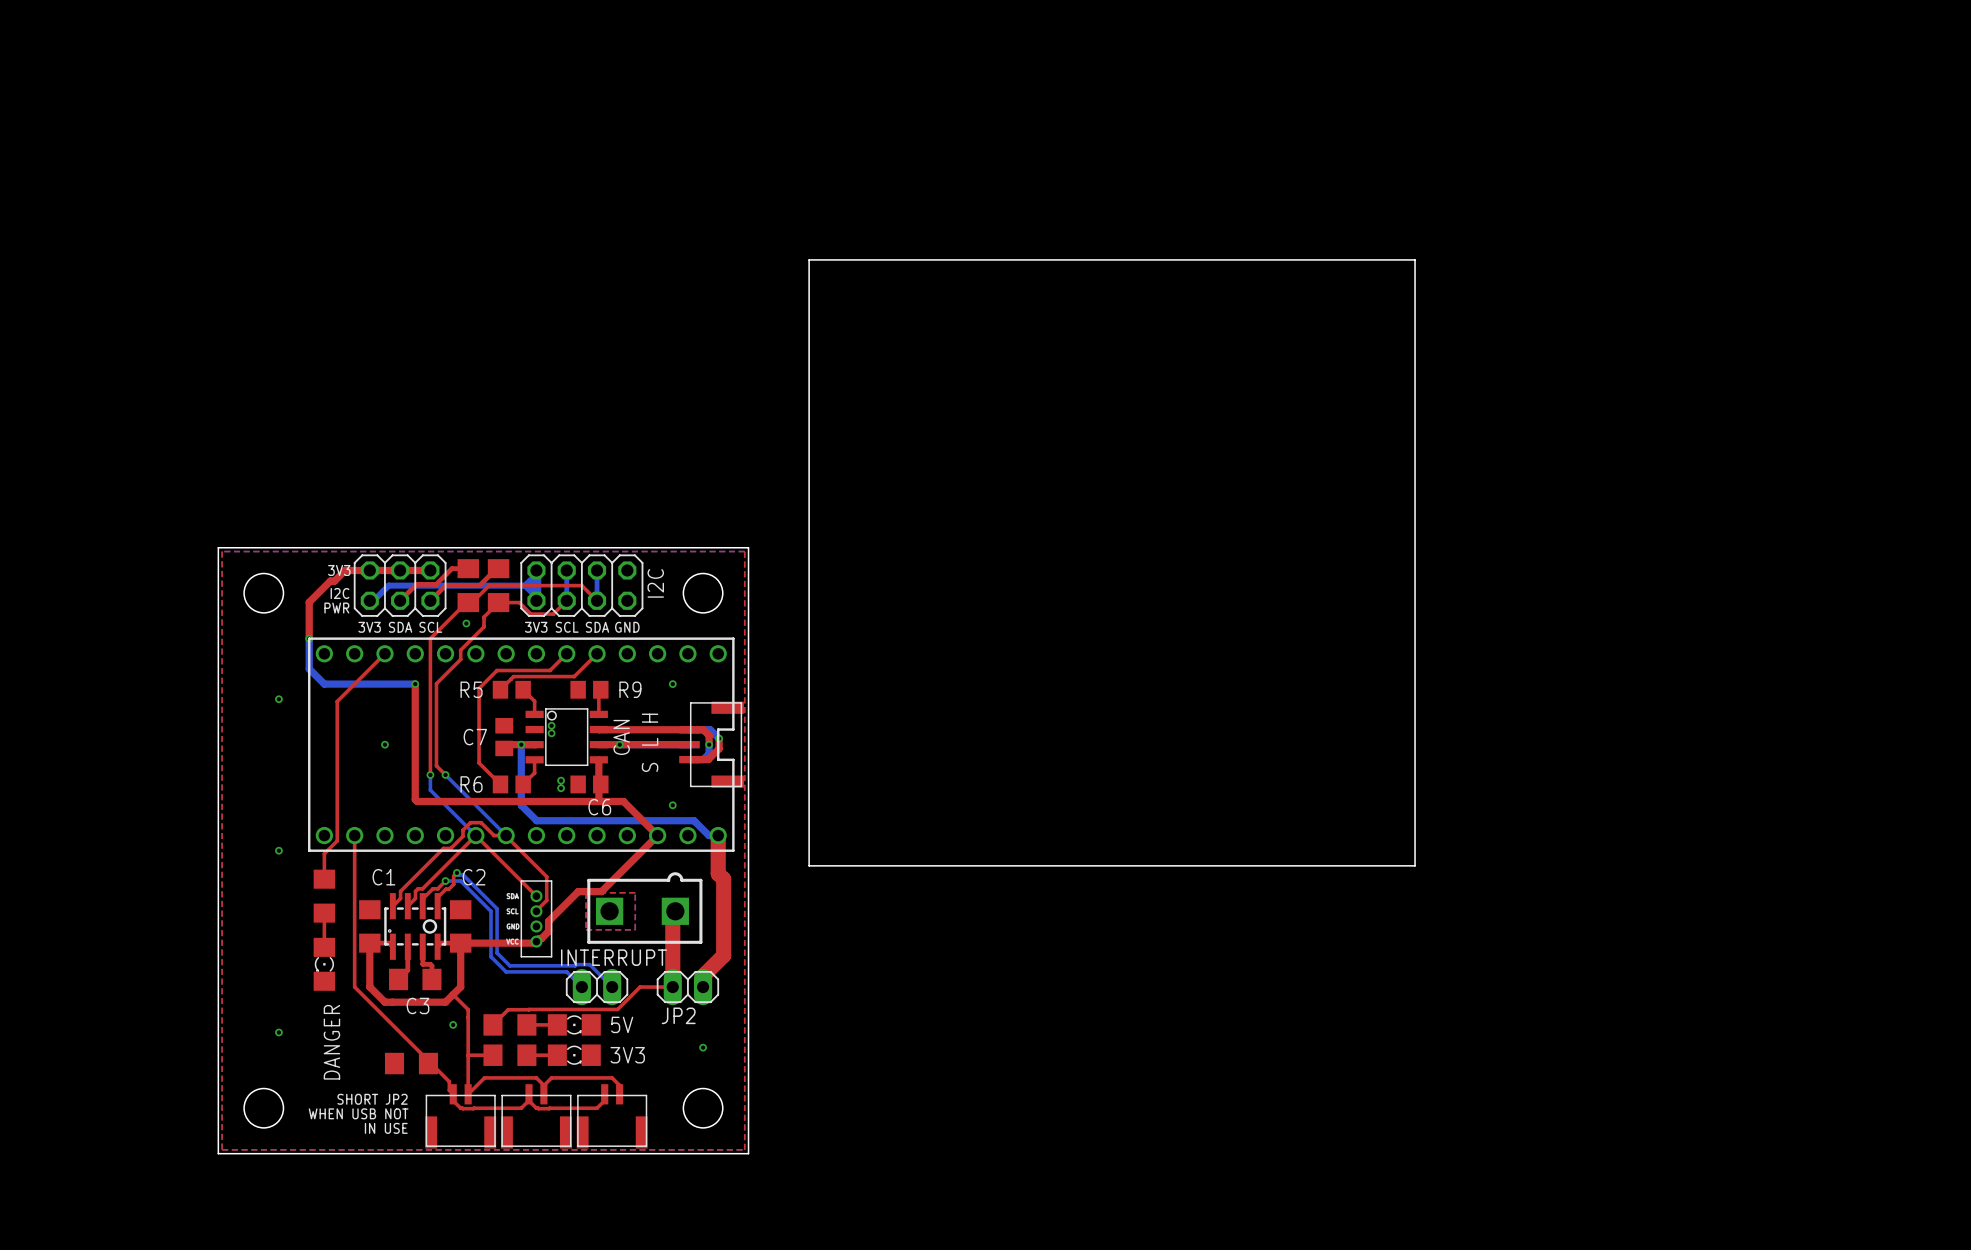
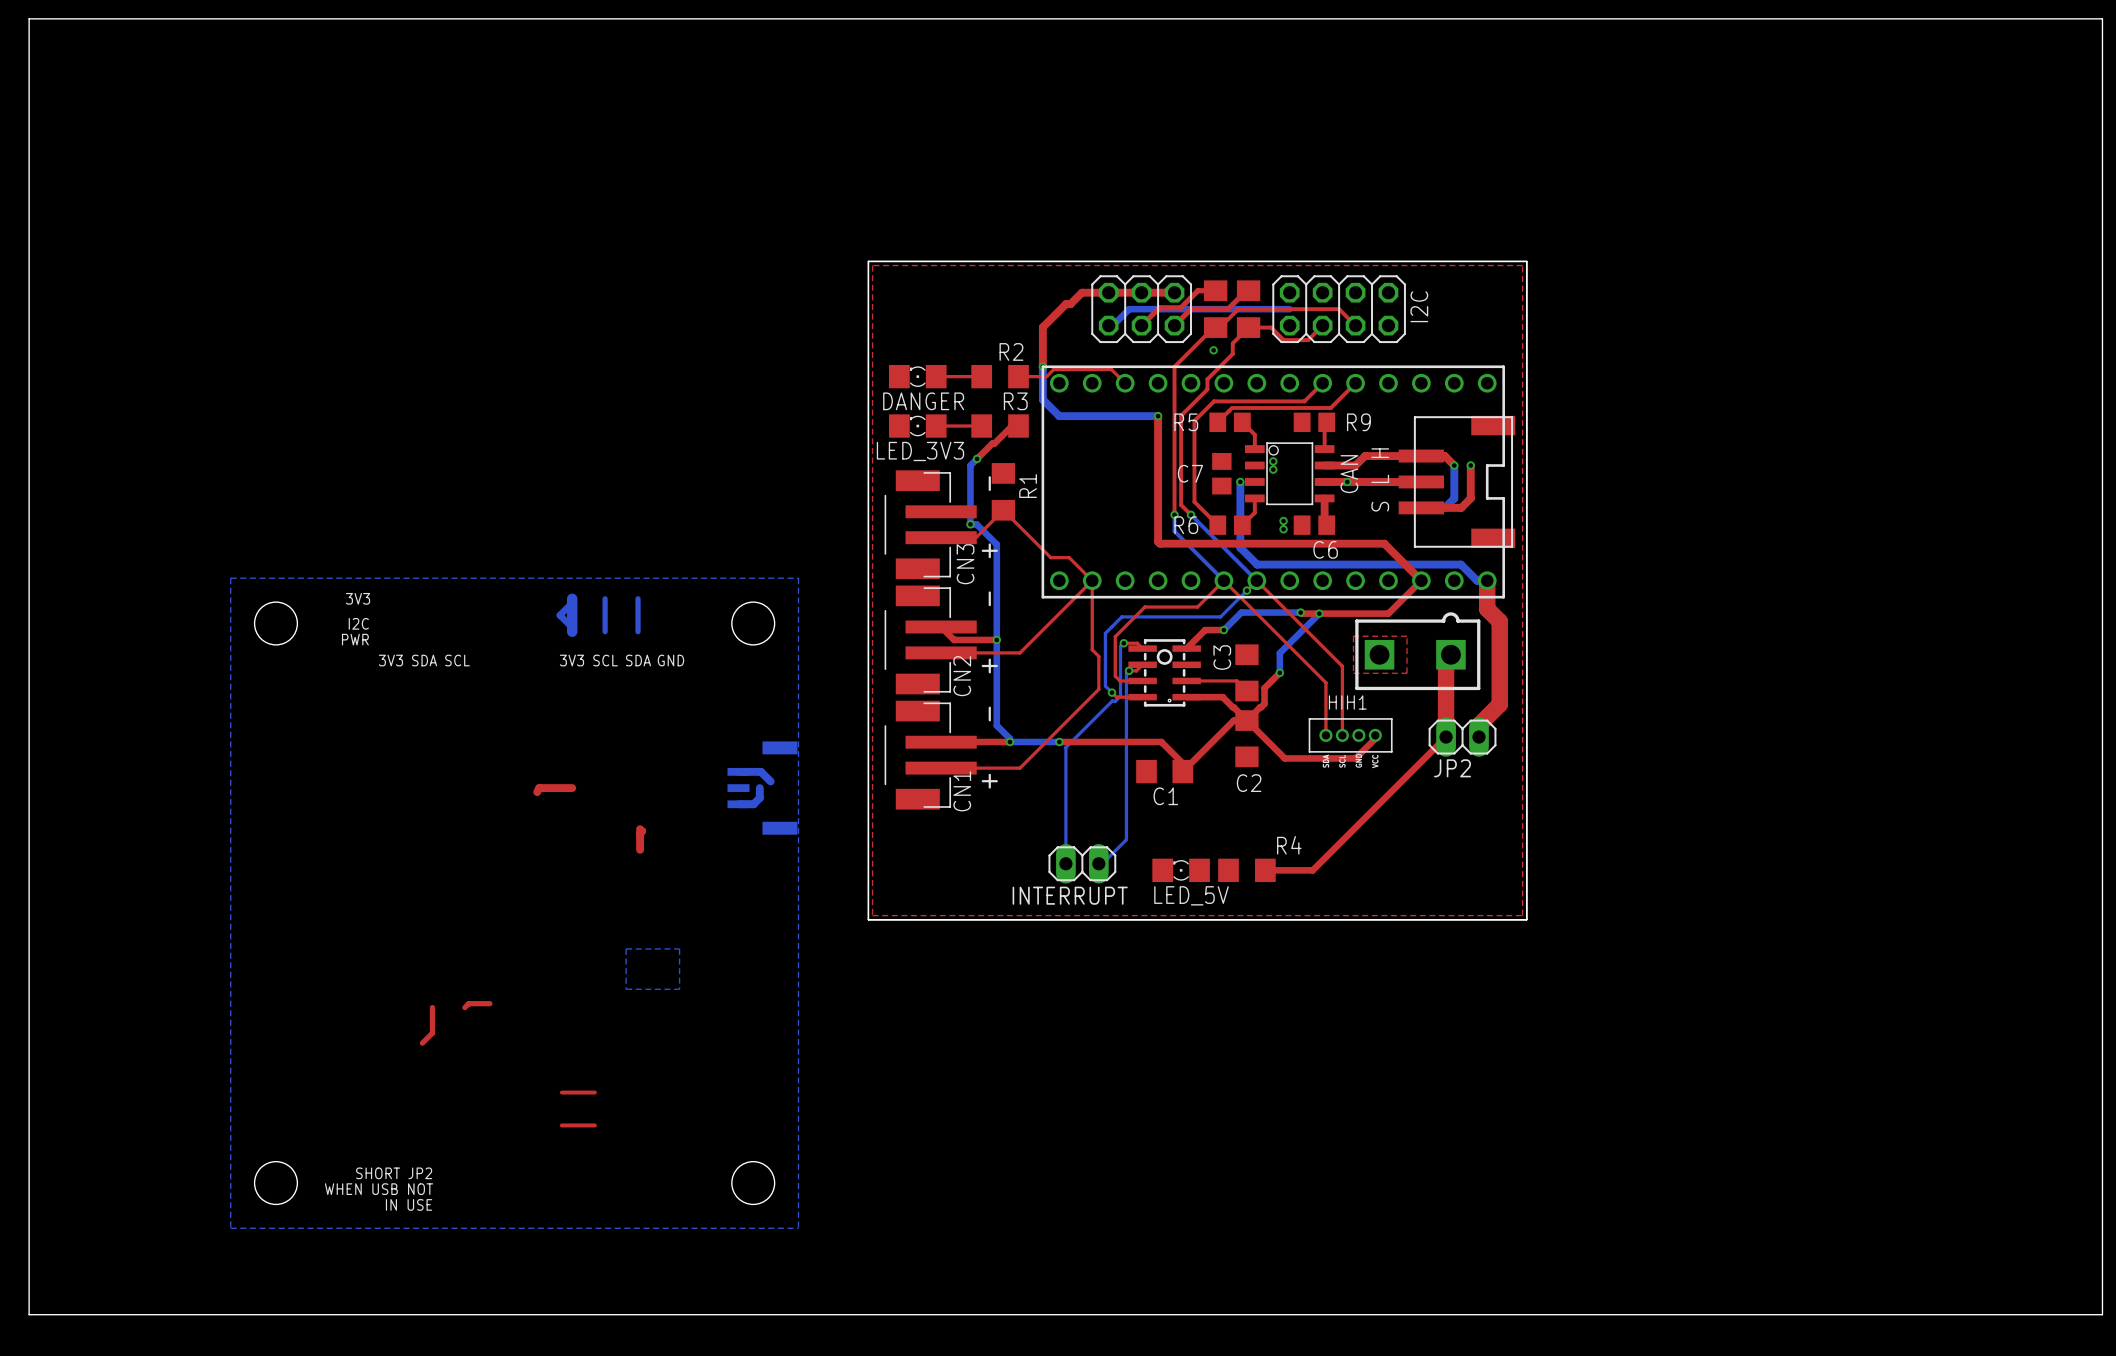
board edge: none -> (29, 18) (2102, 18) (2102, 1314) (29, 1314) (29, 18)
top zone outline: none -> (872, 265) (1522, 265) (1522, 915) (872, 915) (872, 265)
top track: none -> (1215, 290) (1197, 290) (1180, 307) (1159, 307) (1141, 325)
top track: none -> (1248, 290) (1228, 309) (1190, 309) (1174, 325)
top track: none -> (1174, 292) (1081, 292) (1070, 304) (1065, 304) (1042, 327) (1042, 366)
text: none -> I2C (1419, 306)
part: none -> (1141, 309)
part: none -> (1215, 309)
part: none -> (1248, 309)
bottom track: none -> (1289, 309) (1129, 309) (1112, 325) (1108, 325)
part: none -> (1339, 309)
top track: none -> (1322, 325) (1308, 340) (1283, 340) (1271, 327) (1248, 327) (1232, 343) (1232, 353) (1207, 379) (1207, 389) (1181, 415) (1181, 505) (1190, 514)
top track: none -> (1355, 325) (1339, 309) (1238, 309) (1219, 327) (1213, 327) (1174, 366) (1174, 514)
via: none -> (1213, 350)
bottom track: none -> (1042, 366) (1042, 399) (1059, 416) (1158, 416)
via: none -> (1042, 366)
DANGER: none -> (917, 376)
top track: none -> (936, 376) (981, 376)
R2: none -> (1000, 376)
top track: none -> (1018, 376) (1046, 376) (1053, 369) (1111, 369) (1125, 383)
top track: none -> (1322, 383) (1304, 401) (1214, 401) (1194, 420) (1194, 501) (1217, 525)
top track: none -> (1355, 383) (1330, 407) (1232, 407) (1217, 422)
top track: none -> (1158, 416) (1158, 541) (1160, 543) (1384, 543) (1421, 580) (1388, 613) (1300, 612)
via: none -> (1158, 416)
top track: none -> (1242, 422) (1254, 434) (1254, 449)
top track: none -> (1326, 422) (1324, 424) (1324, 449)
LED_3V3: none -> (917, 426)
top track: none -> (936, 426) (981, 426)
R3: none -> (1000, 426)
top track: none -> (1018, 426) (1012, 426) (977, 458)
text: none -> H (1380, 453)
bottom track: none -> (977, 458) (970, 465) (970, 524) (976, 524) (996, 544) (996, 725) (1009, 738) (1009, 741) (1059, 741)
via: none -> (977, 458)
via: none -> (1273, 461)
top track: none -> (1324, 465) (1355, 465) (1365, 456) (1444, 456) (1454, 465)
bottom track: none -> (1454, 465) (1454, 498) (1444, 507) (1421, 507)
via: none -> (1454, 465)
top track: none -> (1470, 465) (1470, 498) (1461, 507) (1421, 507)
via: none -> (1470, 465)
via: none -> (1273, 469)
part: none -> (1289, 473)
text: none -> CAN (1349, 474)
text: none -> L (1380, 478)
bottom track: none -> (1240, 481) (1240, 547) (1257, 564) (1460, 564) (1477, 580) (1487, 580)
via: none -> (1240, 481)
part: none -> (1273, 481)
top track: none -> (1324, 481) (1421, 481)
via: none -> (1347, 481)
part: none -> (1456, 481)
R1: none -> (1003, 491)
top track: none -> (1254, 498) (1254, 512) (1242, 525)
top track: none -> (1324, 498) (1324, 525)
text: none -> S (1380, 506)
bottom track: none -> (1174, 514) (1174, 531) (1223, 580)
via: none -> (1174, 514)
bottom track: none -> (1190, 514) (1256, 580)
via: none -> (1190, 514)
via: none -> (1283, 521)
via: none -> (970, 524)
CN3: none -> (930, 524)
via: none -> (1283, 529)
top track: none -> (941, 537) (975, 537) (1003, 510) (1050, 557) (1069, 557) (1092, 580)
board edge: (218, 547) (748, 547) (748, 1153) (218, 1153) (218, 547) -> none
top zone outline: (222, 551) (744, 551) (744, 1149) (222, 1149) (222, 551) -> none
top track: none -> (1092, 580) (1020, 652) (941, 652)
top track: none -> (1092, 580) (1092, 649) (1098, 656) (1098, 689) (1020, 768) (941, 768)
top track: none -> (1487, 580) (1487, 608) (1499, 621) (1499, 704) (1478, 725) (1478, 737)
top track: none -> (1246, 590) (1256, 580) (1342, 666) (1342, 735)
bottom track: none -> (1246, 590) (1220, 616) (1121, 616) (1105, 633) (1105, 686) (1112, 692)
via: none -> (1246, 590)
top track: (468, 568) (451, 568) (436, 584) (416, 584) (400, 600) -> none
top track: (498, 568) (479, 585) (445, 585) (430, 600) -> none
top track: (430, 570) (345, 570) (334, 581) (330, 581) (309, 602) (309, 638) -> none
text: I2C (655, 583) -> none
bottom track: none -> (1300, 612) (1241, 612) (1223, 630)
via: none -> (1300, 612)
bottom track: none -> (1319, 613) (1279, 653) (1279, 672)
via: none -> (1319, 613)
part: (400, 585) -> none
part: (468, 585) -> none
part: (498, 585) -> none
bottom track: (536, 585) (388, 585) (373, 600) (369, 600) -> none
part: (581, 585) -> none
top track: none -> (941, 627) (954, 639) (996, 639)
top track: none -> (1223, 630) (1205, 630) (1186, 648)
via: none -> (1223, 630)
top track: (566, 600) (553, 614) (530, 614) (519, 602) (498, 602) (484, 617) (484, 626) (460, 650) (460, 659) (436, 683) (436, 765) (445, 774) -> none
top track: (597, 600) (581, 585) (489, 585) (472, 602) (466, 602) (430, 638) (430, 774) -> none
top zone outline: none -> (1353, 636) (1406, 636) (1406, 673) (1353, 673) (1353, 636)
CN2: none -> (930, 639)
via: none -> (996, 639)
top track: none -> (1123, 643) (1137, 643) (1142, 648)
bottom track: none -> (1123, 643) (1120, 646) (1120, 696) (1115, 701) (1112, 701) (1065, 747) (1065, 863)
via: none -> (1123, 643)
part: none -> (1417, 651)
top track: none -> (1450, 654) (1446, 659) (1446, 737) (1312, 870) (1265, 870)
via: (466, 623) -> none
top track: none -> (1142, 664) (1136, 670) (1129, 670)
bottom track: none -> (1129, 670) (1126, 673) (1126, 839) (1102, 863) (1098, 863)
via: none -> (1129, 670)
bottom track: (309, 638) (309, 668) (324, 684) (415, 684) -> none
via: (309, 638) -> none
part: none -> (1164, 672)
top track: none -> (1279, 672) (1264, 688) (1264, 703) (1246, 720) (1233, 720) (1182, 771) (1182, 763) (1161, 741) (1059, 741)
via: none -> (1279, 672)
top track: none -> (1142, 680) (1120, 680) (1115, 676) (1115, 636) (1144, 607) (1197, 607) (1223, 580) (1325, 682) (1325, 735)
top track: none -> (1186, 680) (1236, 680) (1246, 691)
top track: (384, 653) (337, 701) (337, 840) (324, 853) (324, 879) -> none
top track: (566, 653) (550, 670) (497, 670) (479, 688) (479, 763) (500, 784) -> none
top track: (597, 653) (574, 676) (513, 676) (500, 689) -> none
top track: none -> (1112, 692) (1116, 697) (1142, 697)
via: none -> (1112, 692)
top track: none -> (1186, 697) (1222, 697) (1284, 758) (1355, 758) (1375, 738) (1375, 735)
top track: (415, 684) (415, 799) (417, 801) (623, 801) (657, 835) -> none
via: (415, 684) -> none
via: (672, 684) -> none
R5 position: (511, 689) -> (1230, 422)
top track: (523, 689) (534, 701) (534, 714) -> none
R9 position: (589, 689) -> (1314, 422)
top track: (600, 689) (598, 691) (598, 714) -> none
HIH1: none -> (1350, 735)
via: (278, 699) -> none
top track: none -> (1009, 741) (941, 742)
via: none -> (1009, 741)
via: none -> (1059, 741)
CN1: none -> (930, 755)
text: H (650, 718) -> none
via: (551, 725) -> none
top track: (598, 729) (703, 729) (709, 735) (709, 744) -> none
via: (551, 733) -> none
C7 position: (504, 737) -> (1221, 473)
part: (566, 737) -> none
text: CAN (621, 737) -> none
top track: (719, 738) (719, 748) (708, 759) (689, 759) -> none
via: (719, 738) -> none
text: L (650, 741) -> none
via: (384, 744) -> none
bottom track: (521, 744) (521, 805) (536, 820) (694, 820) (708, 835) (718, 835) -> none
part: (521, 744) -> none
via: (521, 744) -> none
top track: (598, 744) (689, 744) -> none
via: (619, 744) -> none
via: (709, 744) -> none
part: (711, 744) -> none
top track: (534, 759) (534, 772) (523, 784) -> none
top track: (598, 759) (598, 784) -> none
text: S (650, 767) -> none
bottom track: (430, 774) (430, 790) (475, 835) -> none
via: (430, 774) -> none
bottom track: (445, 774) (506, 835) -> none
via: (445, 774) -> none
via: (561, 780) -> none
R6 position: (511, 784) -> (1230, 525)
C6 position: (589, 784) -> (1314, 525)
via: (561, 788) -> none
via: (672, 805) -> none
INTERRUPT: none -> (1082, 863)
LED_5V: none -> (1181, 870)
R4: none -> (1246, 870)
top track: (354, 835) (354, 987) (428, 1060) (428, 1063) (432, 1064) (449, 1081) (449, 1090) (453, 1094) (453, 1100) (460, 1108) (521, 1108) (528, 1100) -> none
top track: (657, 835) (601, 891) (578, 891) (548, 921) (548, 931) (534, 943) (460, 943) (460, 987) (445, 1002) (384, 1002) (369, 987) (369, 943) (389, 943) (392, 946) -> none
top track: (718, 835) (718, 873) (723, 879) (723, 955) (704, 974) (703, 987) -> none
via: (278, 850) -> none
top track: (456, 872) (453, 876) (453, 884) (437, 897) (437, 906) -> none
bottom track: (456, 872) (463, 874) (497, 908) (497, 952) (509, 965) (589, 964) (612, 987) -> none
via: (456, 872) -> none
C1 name position: C1 (383, 877) -> C1 (1165, 796)
C2 name position: C2 (474, 877) -> C2 (1249, 783)
top track: (445, 881) (437, 888) (432, 888) (422, 898) (422, 906) -> none
bottom track: (445, 881) (460, 881) (491, 911) (491, 956) (506, 971) (566, 971) (581, 987) -> none
via: (445, 881) -> none
top zone outline: (586, 892) (635, 892) (635, 929) (586, 929) (586, 892) -> none
part: (324, 896) -> none
top track: (536, 896) (475, 835) (422, 888) (417, 888) (415, 891) (415, 898) (407, 906) -> none
top track: (392, 906) (400, 898) (400, 891) (443, 848) (450, 848) (462, 836) (462, 830) (470, 822) (481, 822) (494, 835) (506, 835) (546, 876) (546, 900) (536, 911) -> none
part: (644, 908) -> none
top track: (675, 911) (672, 915) (672, 987) (640, 987) (617, 1009) (508, 1009) (492, 1024) -> none
top track: (324, 913) (324, 947) -> none
part: (536, 918) -> none
C1 rotation: 0° (369, 926) -> 90° clockwise (1164, 771)
C1 position: (369, 926) -> (1164, 771)
part: (415, 926) -> none
C2 position: (460, 926) -> (1246, 738)
top track: (422, 946) (422, 964) (431, 965) (431, 979) -> none
DANGER: (324, 964) -> none
C3 rotation: 0° (415, 979) -> 90° clockwise (1246, 672)
C3 position: (415, 979) -> (1246, 672)
INTERRUPT: (597, 987) -> none
JP2 position: (687, 987) -> (1462, 737)
top track: (453, 994) (468, 1009) (468, 1094) (484, 1077) (536, 1077) (543, 1085) (543, 1094) -> none
via: (453, 1024) -> none
part: (509, 1024) -> none
5V: (574, 1024) -> none
via: (278, 1032) -> none
via: (703, 1047) -> none
top track: (468, 1055) (492, 1055) -> none
part: (509, 1055) -> none
3V3: (574, 1055) -> none
part: (411, 1063) -> none
top track: (543, 1085) (551, 1077) (612, 1077) (619, 1085) (619, 1094) -> none
top track: (528, 1094) (528, 1100) (538, 1108) (597, 1108) (604, 1100) (604, 1094) -> none
part: (460, 1116) -> none
part: (536, 1116) -> none
part: (612, 1116) -> none

